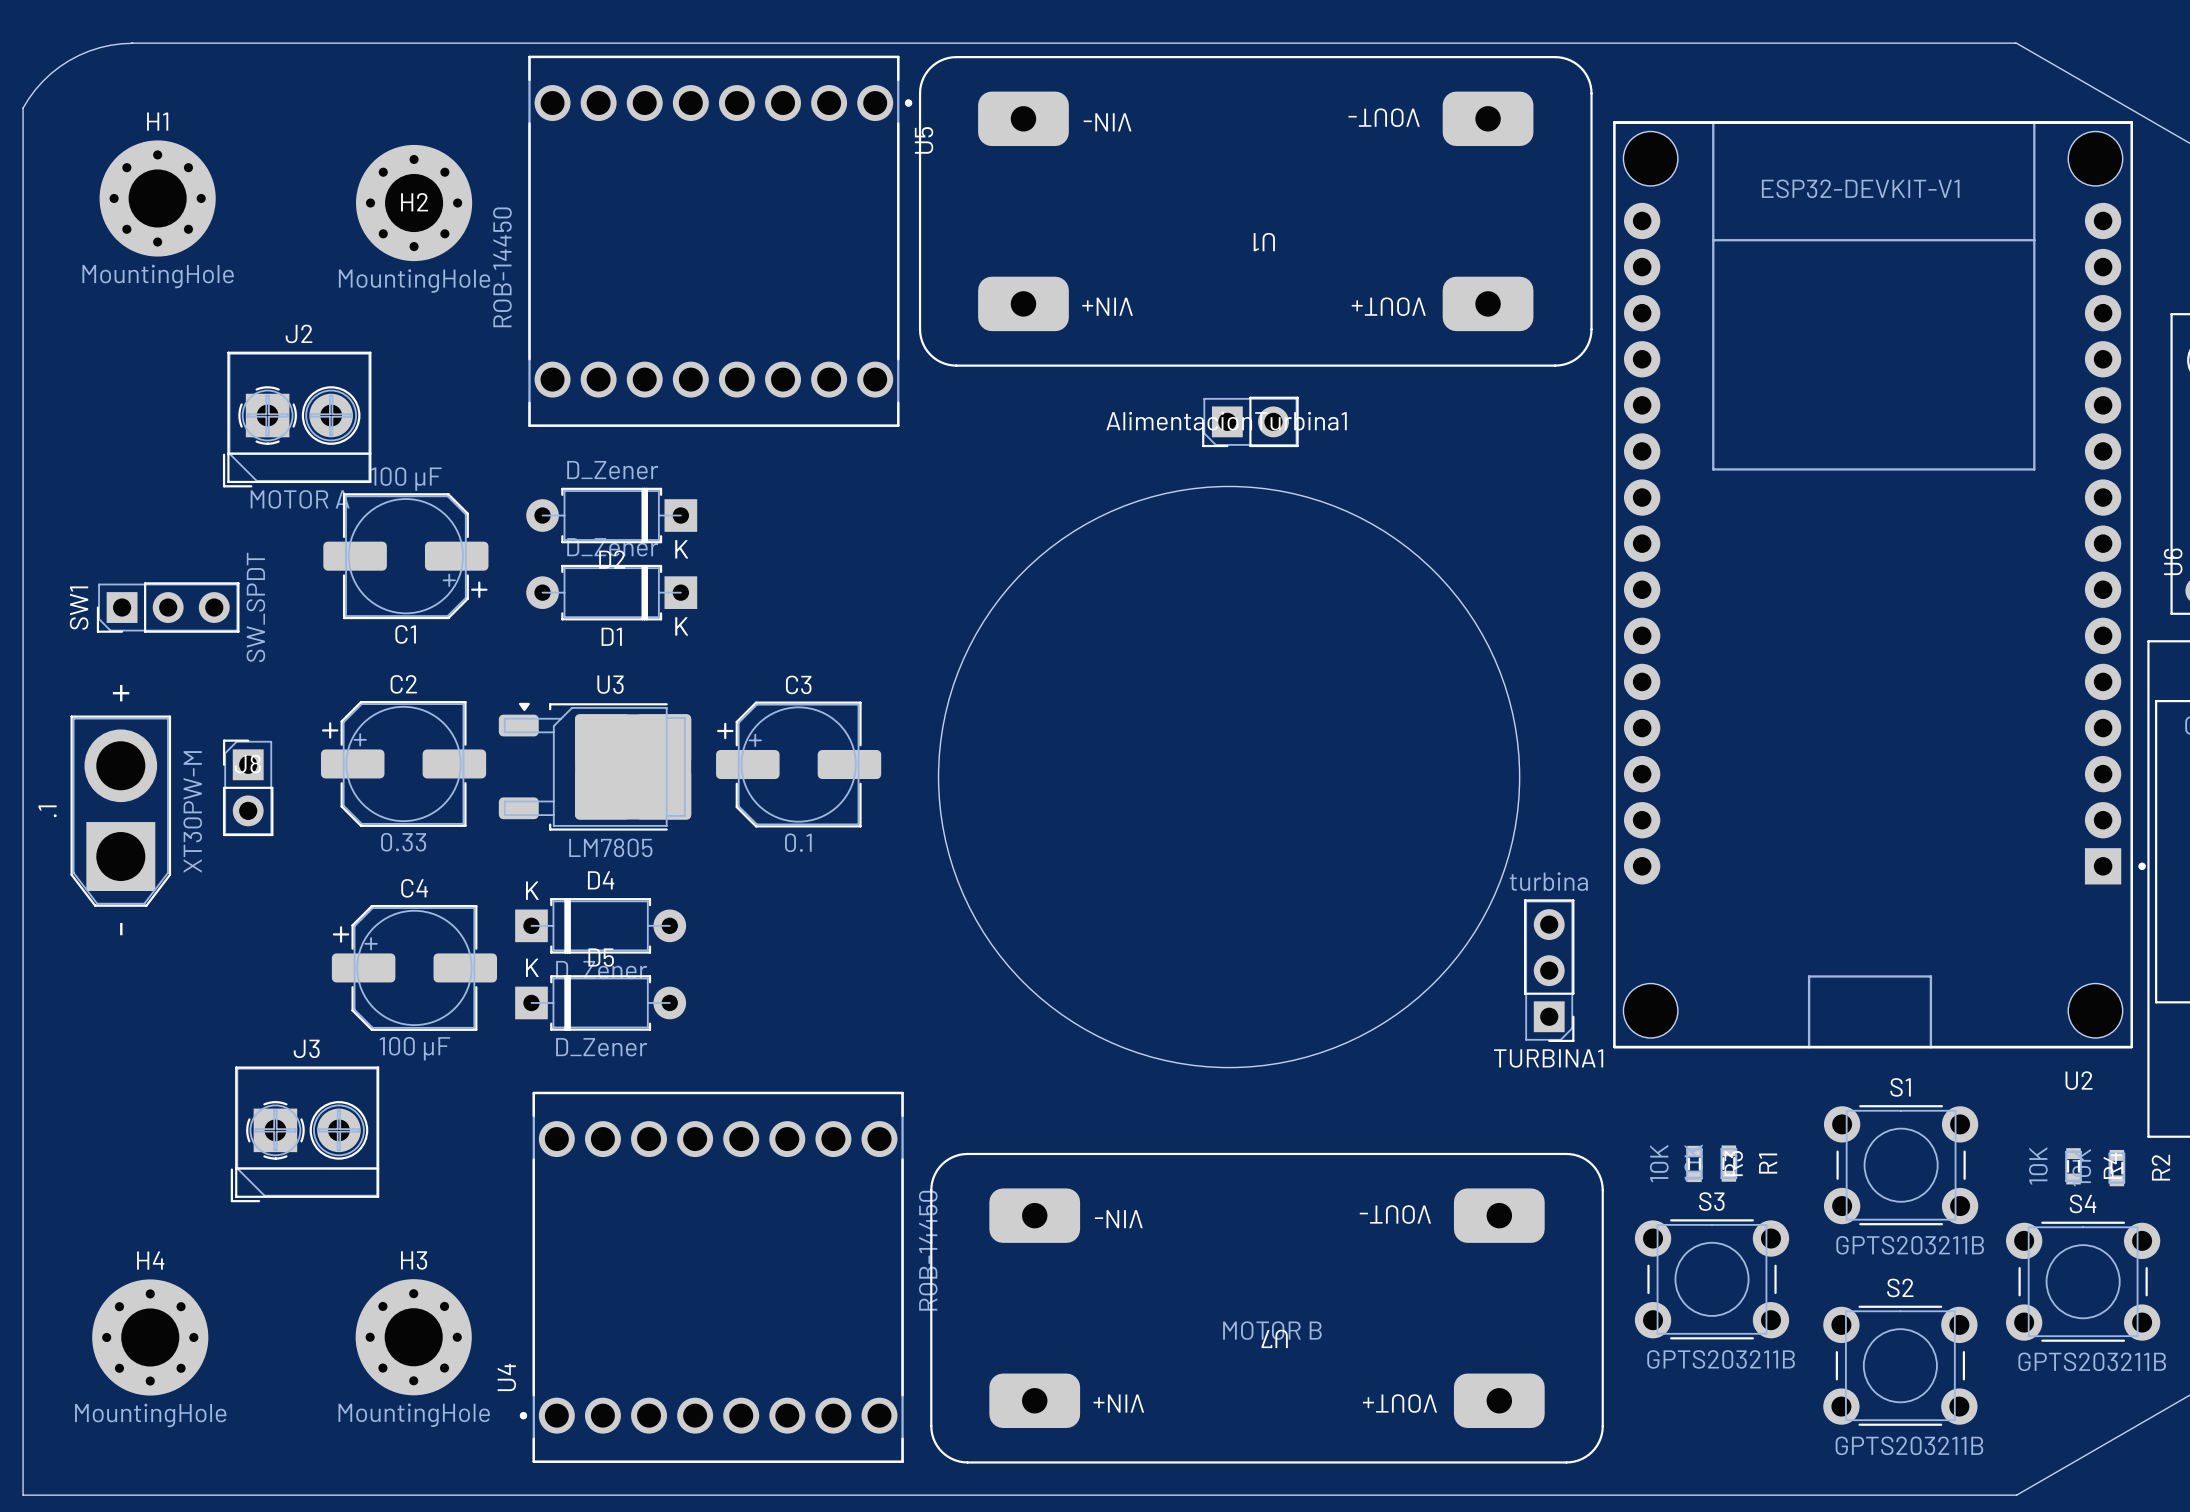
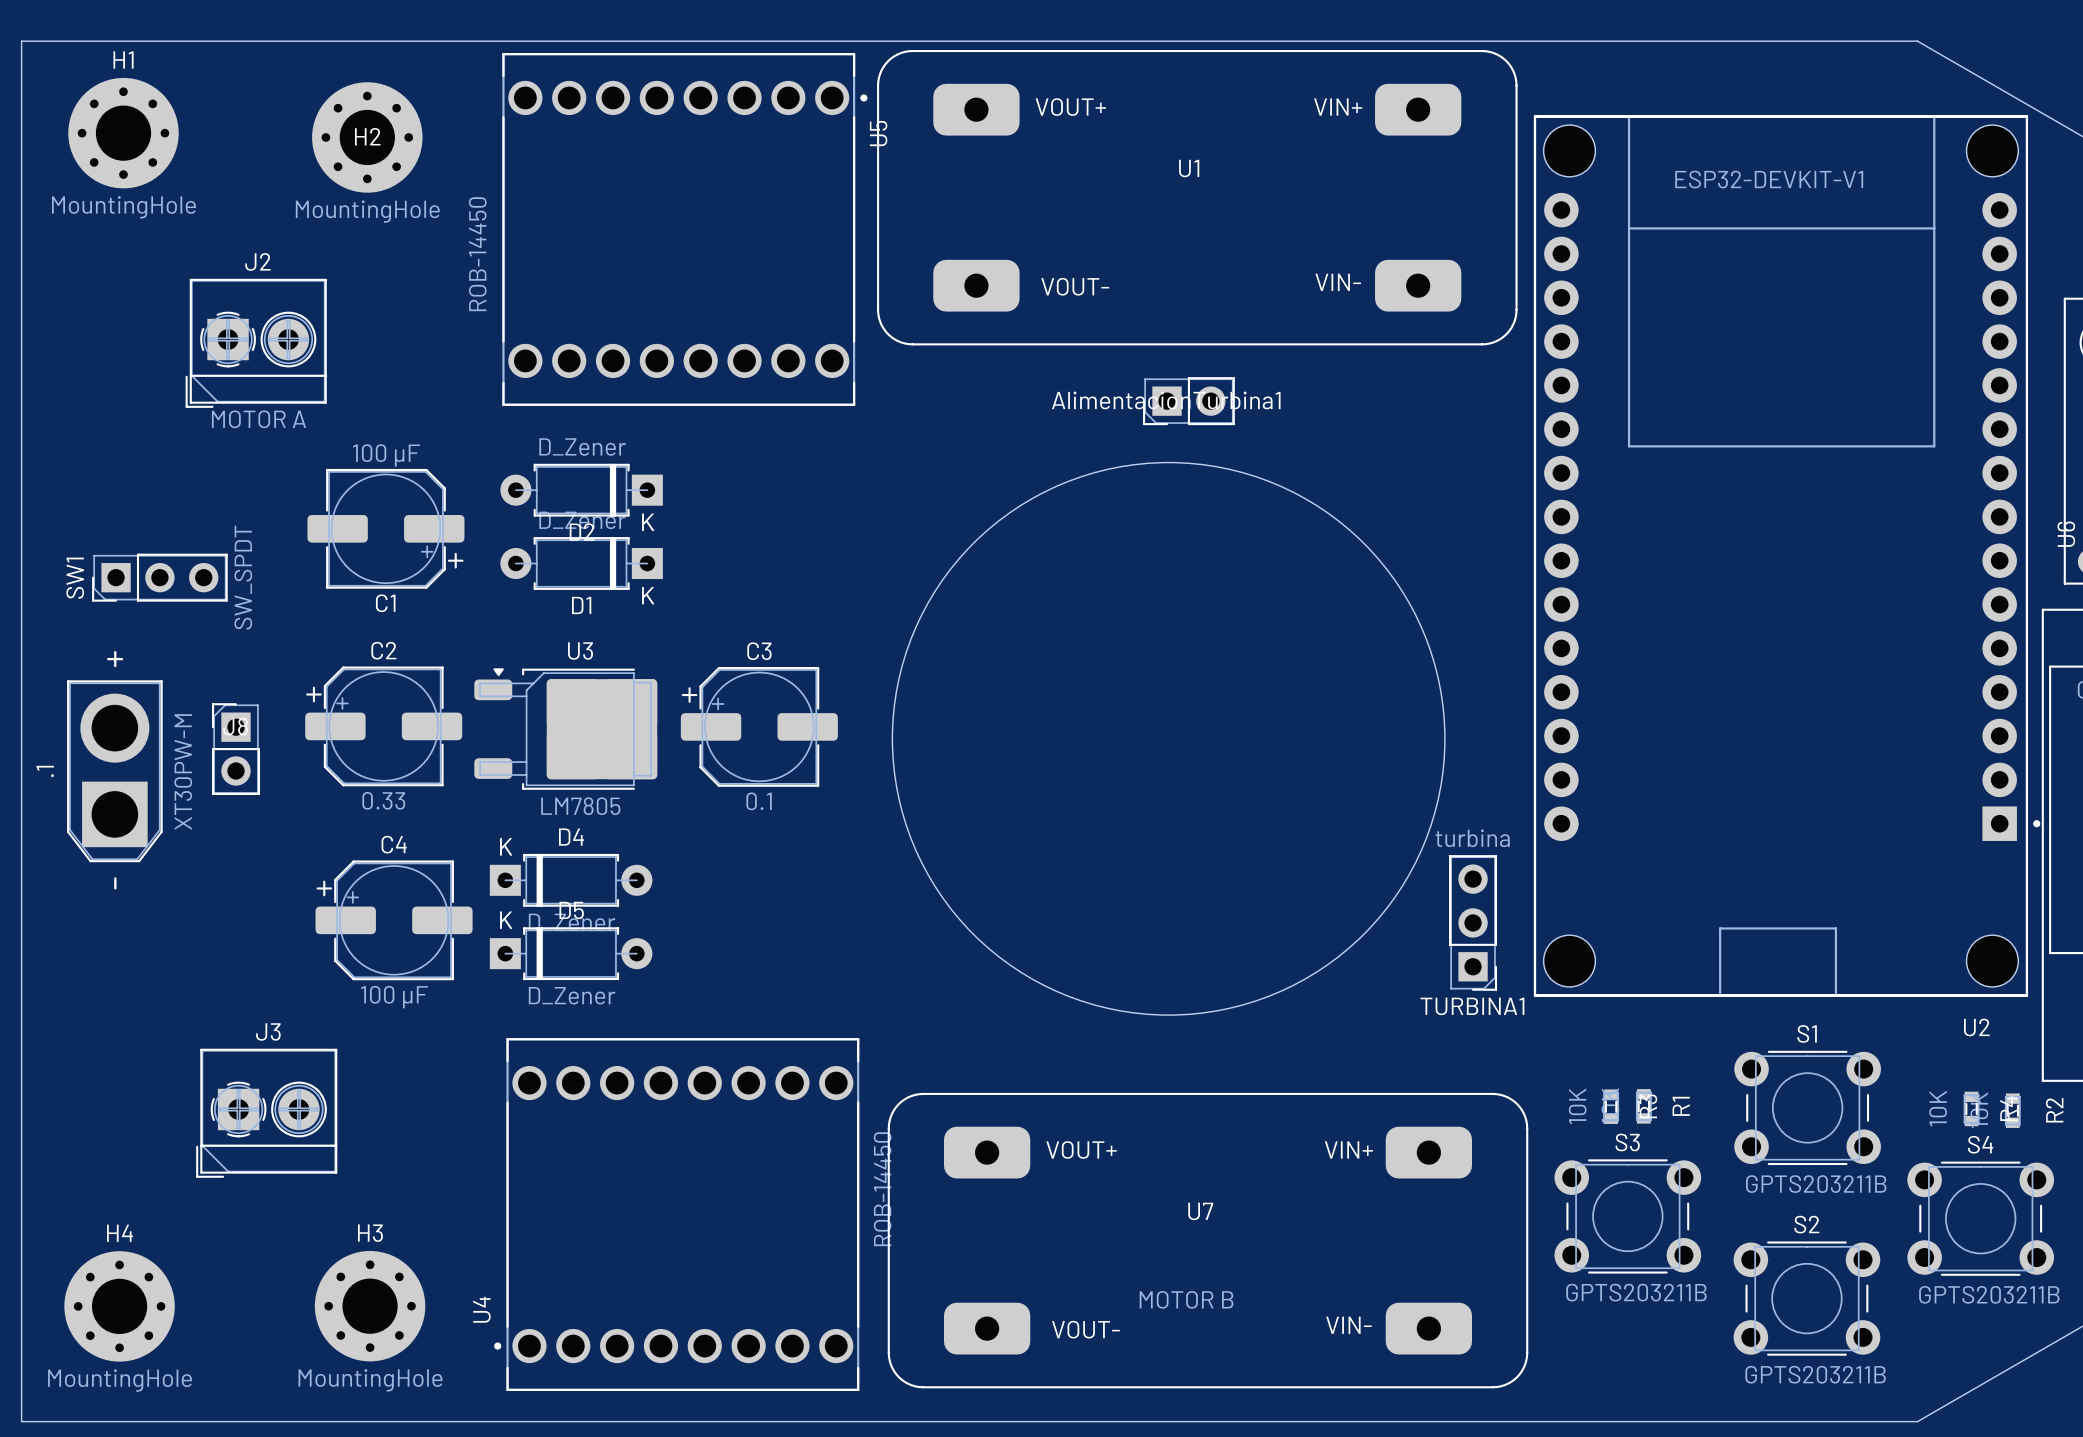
board edge: (131, 43) (2016, 43) -> (22, 1421) (21, 41) (1917, 41)
board edge: (132, 43) (99, 47) (69, 60) (42, 81) (23, 108) (23, 1495) -> none
H1 position: (157, 198) -> (123, 133)
H2 position: (414, 203) -> (367, 137)
U1 rotation: 0° (1255, 211) -> 180° (1197, 197)
J2 position: (297, 419) -> (256, 343)
J3 position: (305, 1134) -> (266, 1113)
U7 rotation: 0° (1267, 1308) -> 180° (1208, 1240)
H4 position: (150, 1337) -> (119, 1306)
H3 position: (413, 1337) -> (370, 1306)

